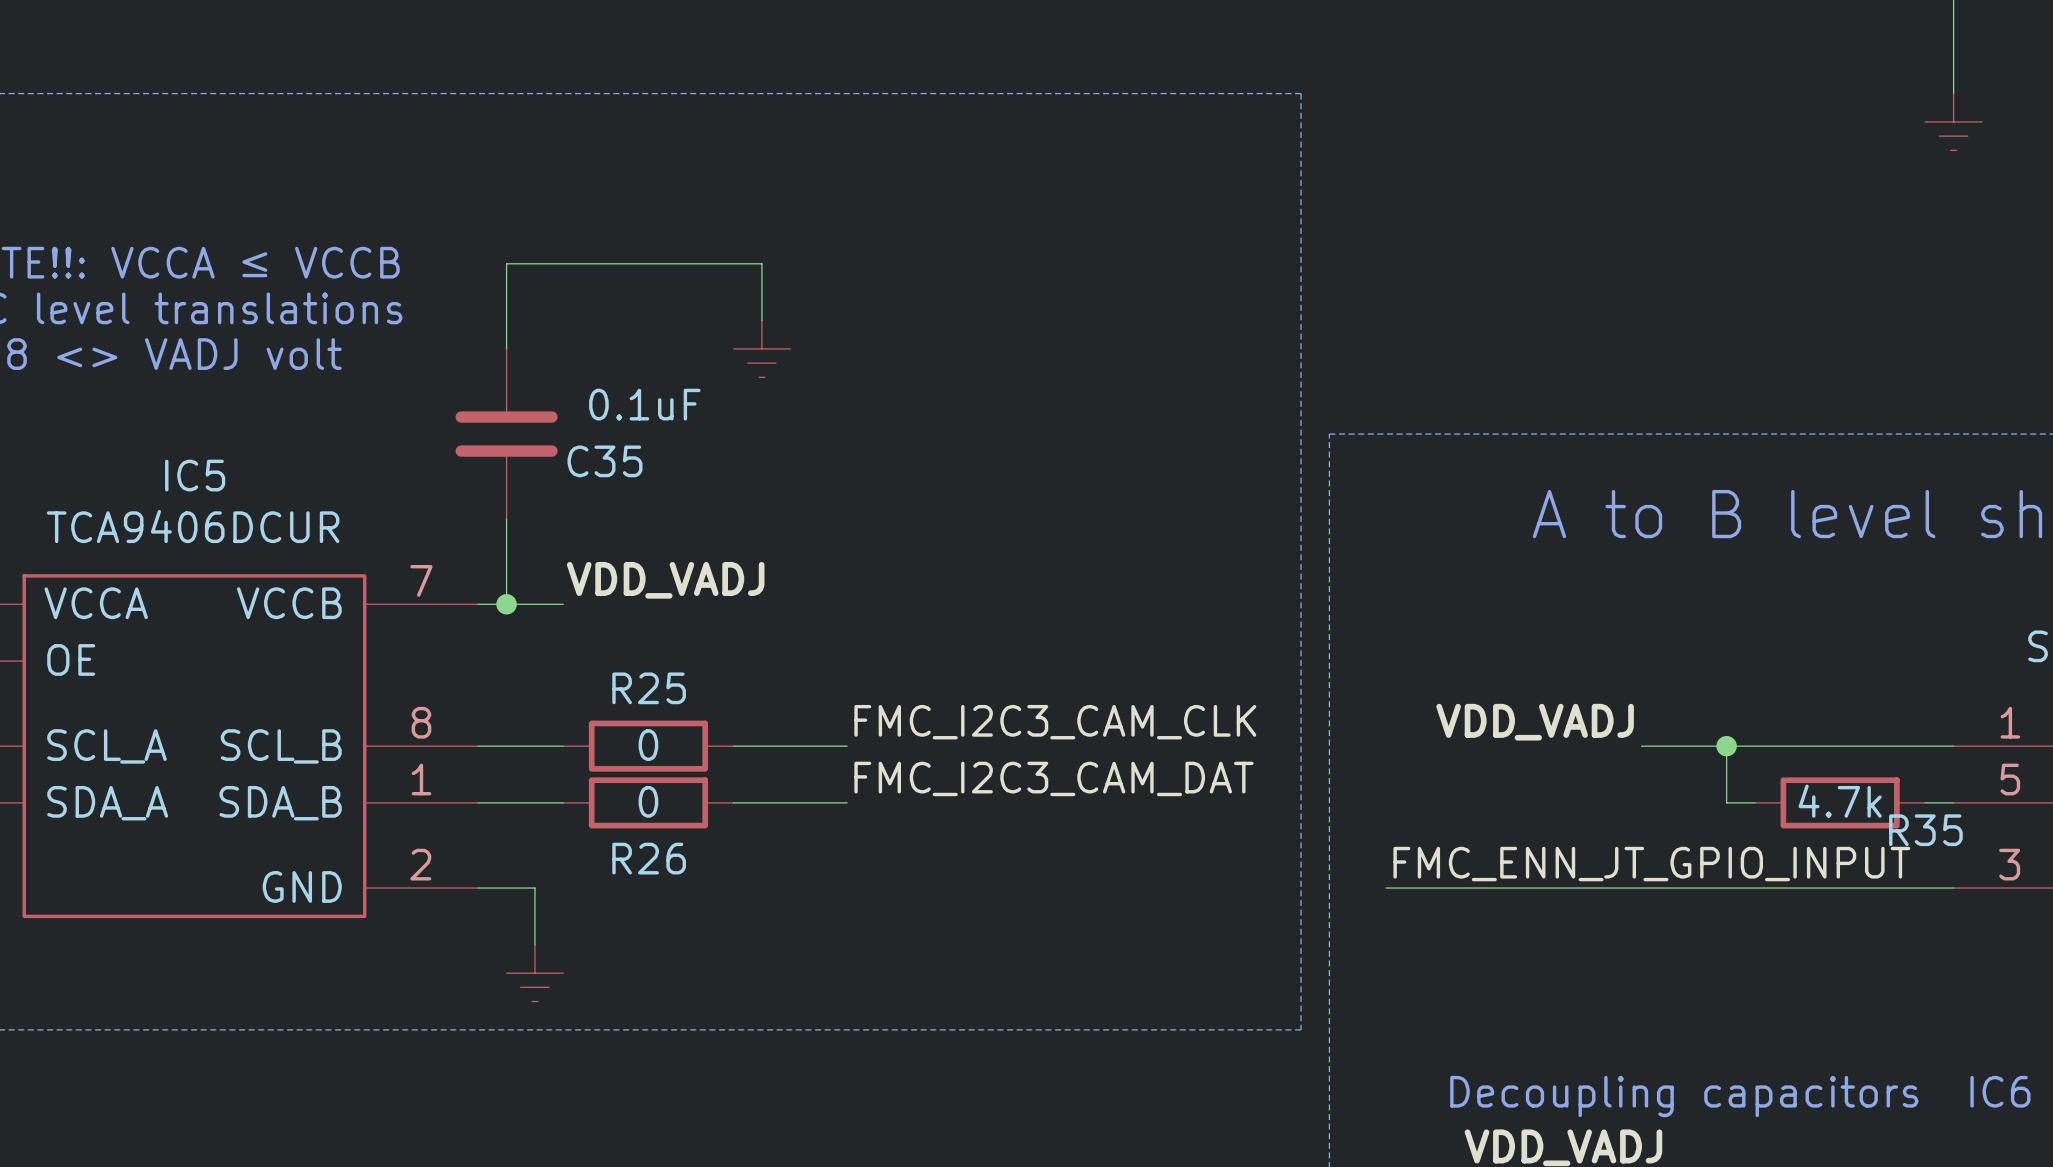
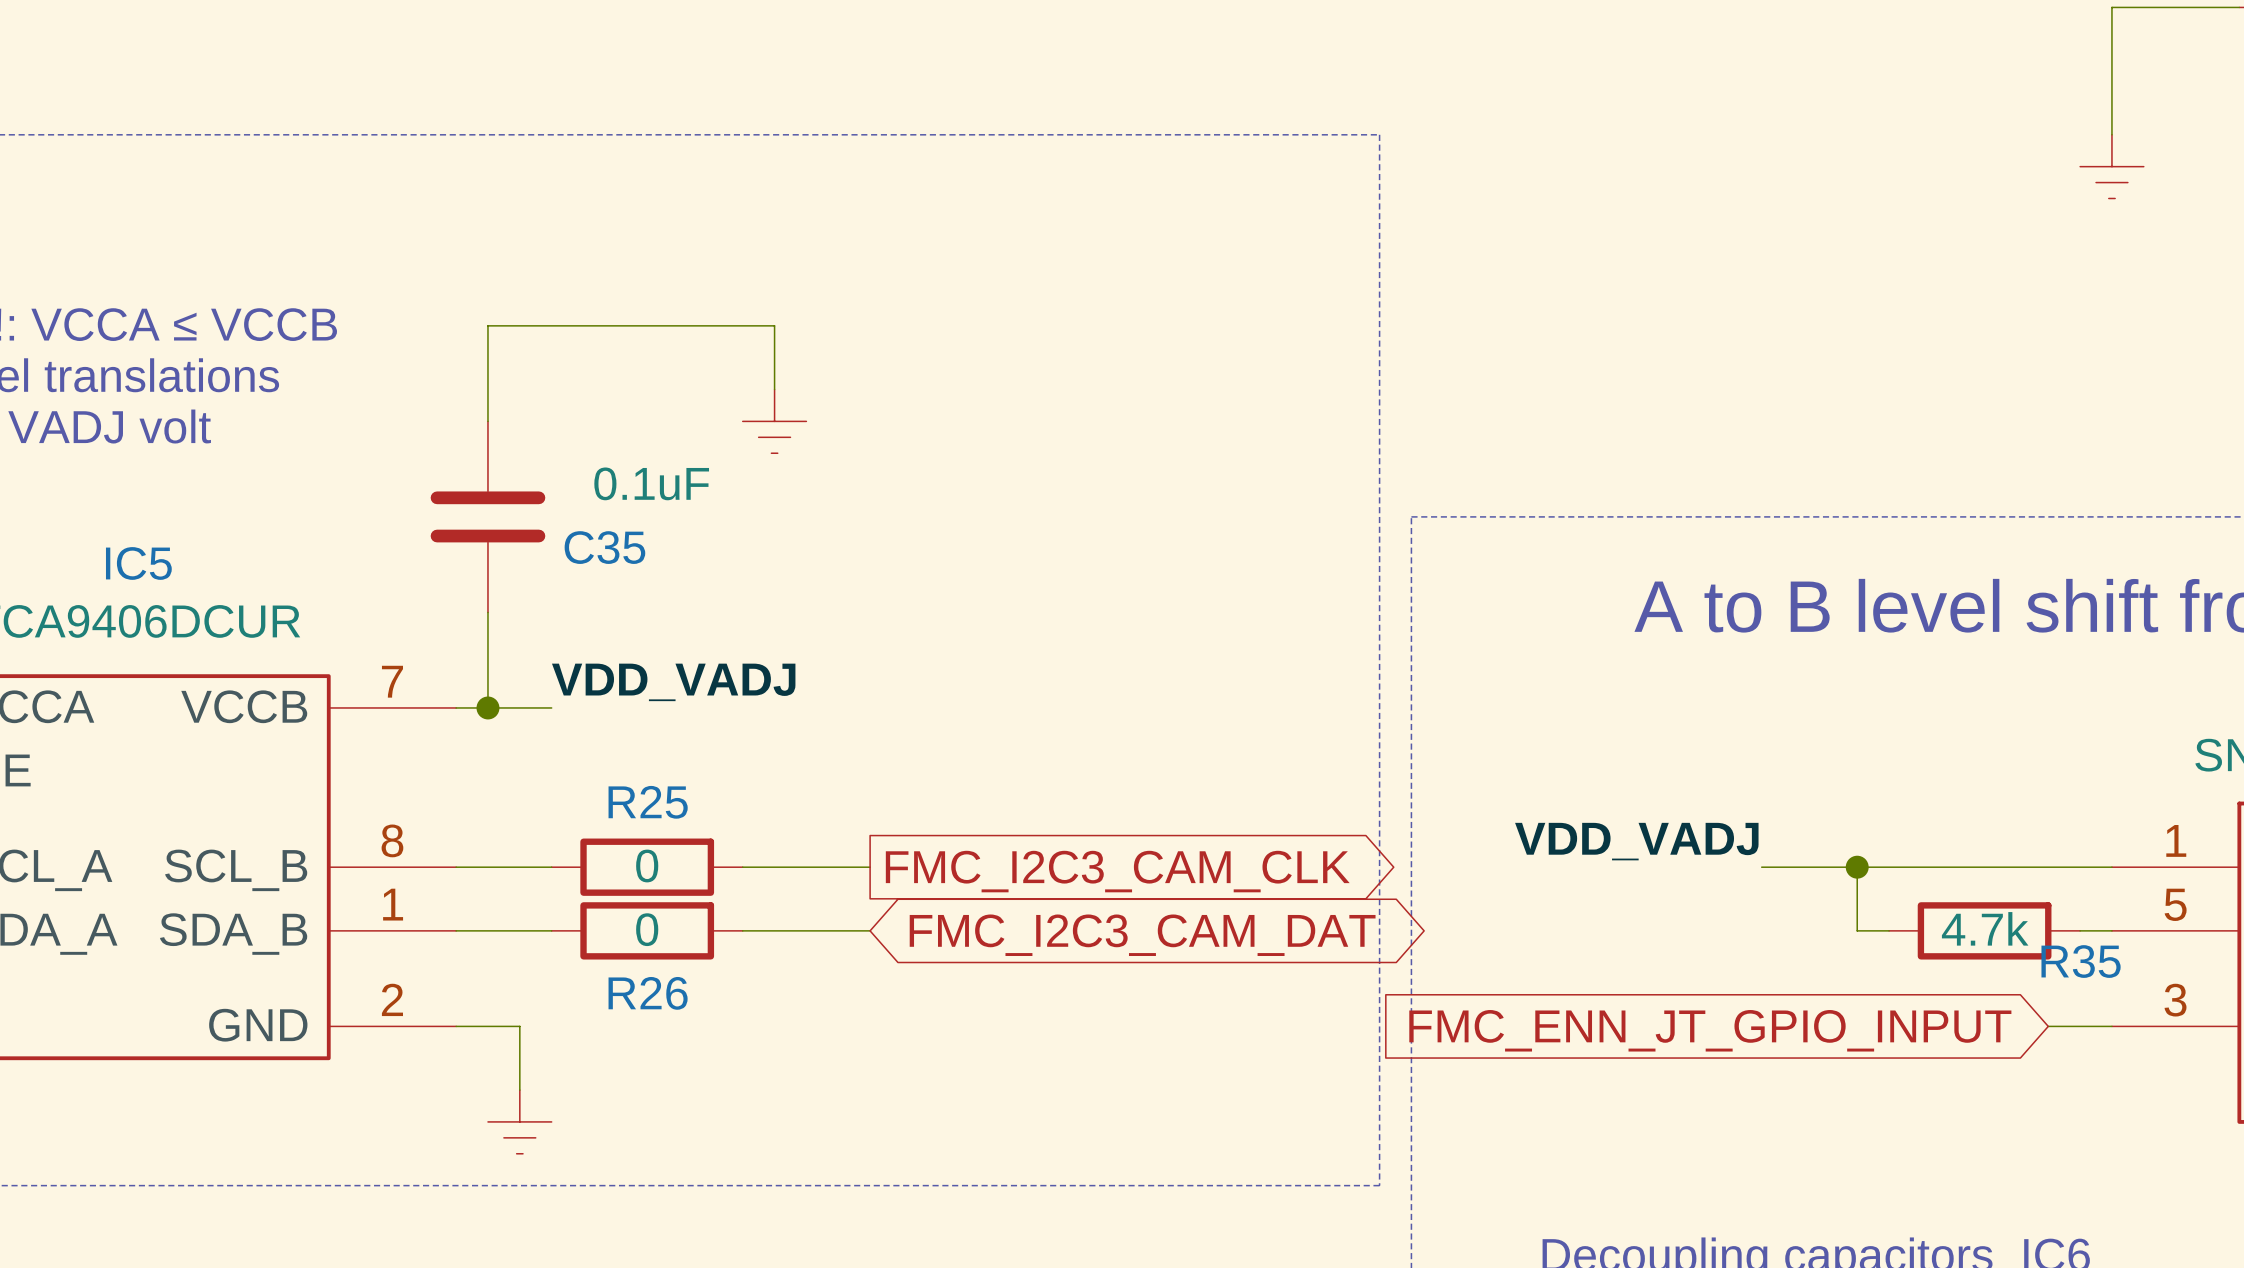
label: FMC_I2C3_CAM_CLK (1055, 722) -> none
global label: none -> FMC_I2C3_CAM_CLK (1117, 871)
label: FMC_I2C3_CAM_DAT (1053, 778) -> none
global label: none -> FMC_I2C3_CAM_DAT (1142, 935)
label: FMC_ENN_JT_GPIO_INPUT (1651, 864) -> none
wire: (1386, 888) (1896, 888) -> none
global label: none -> FMC_ENN_JT_GPIO_INPUT (1710, 1030)

